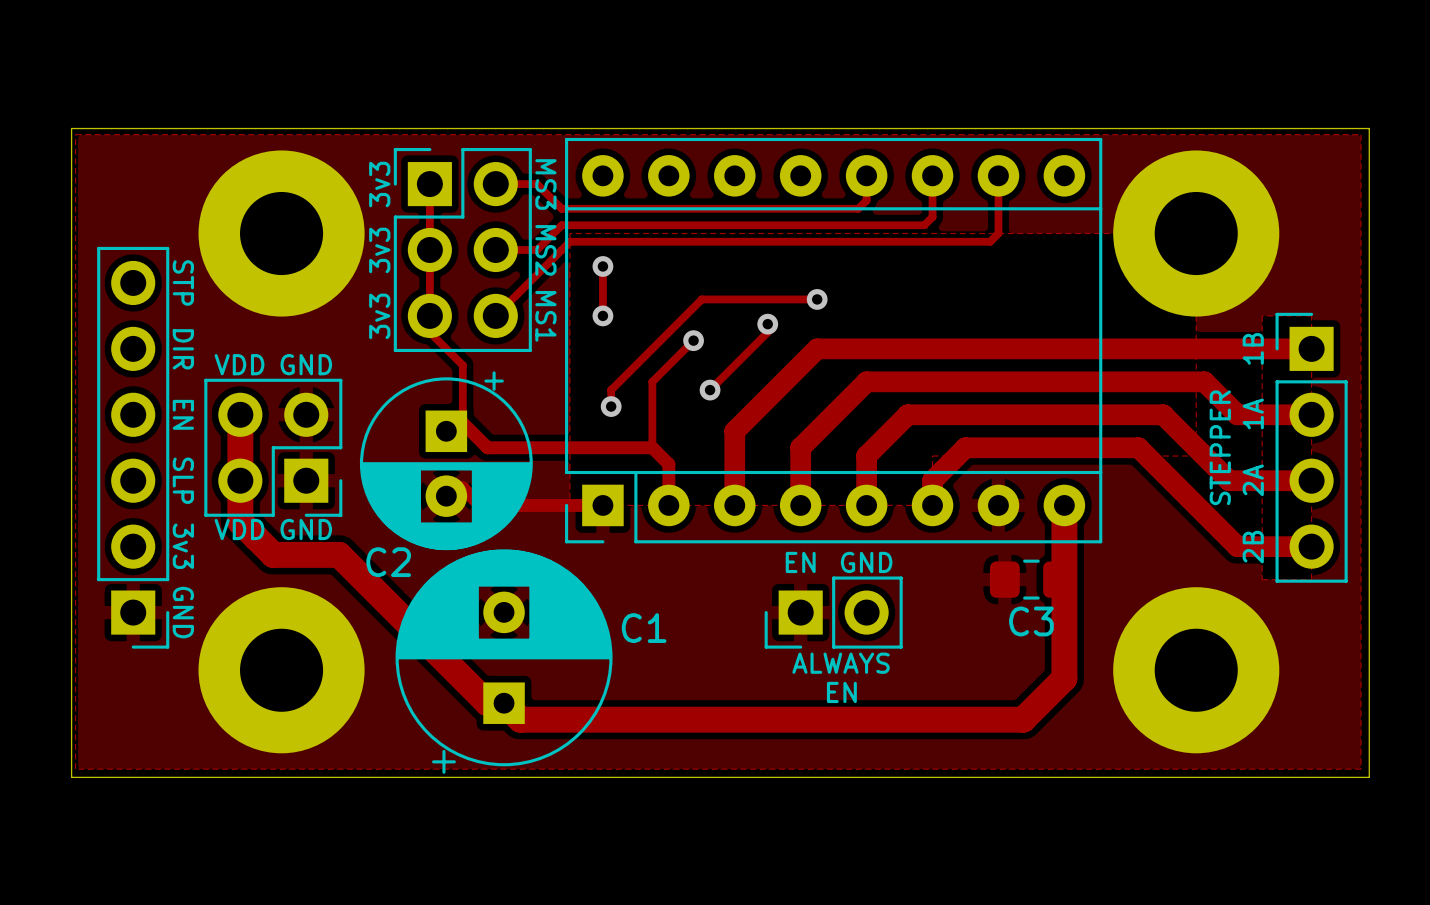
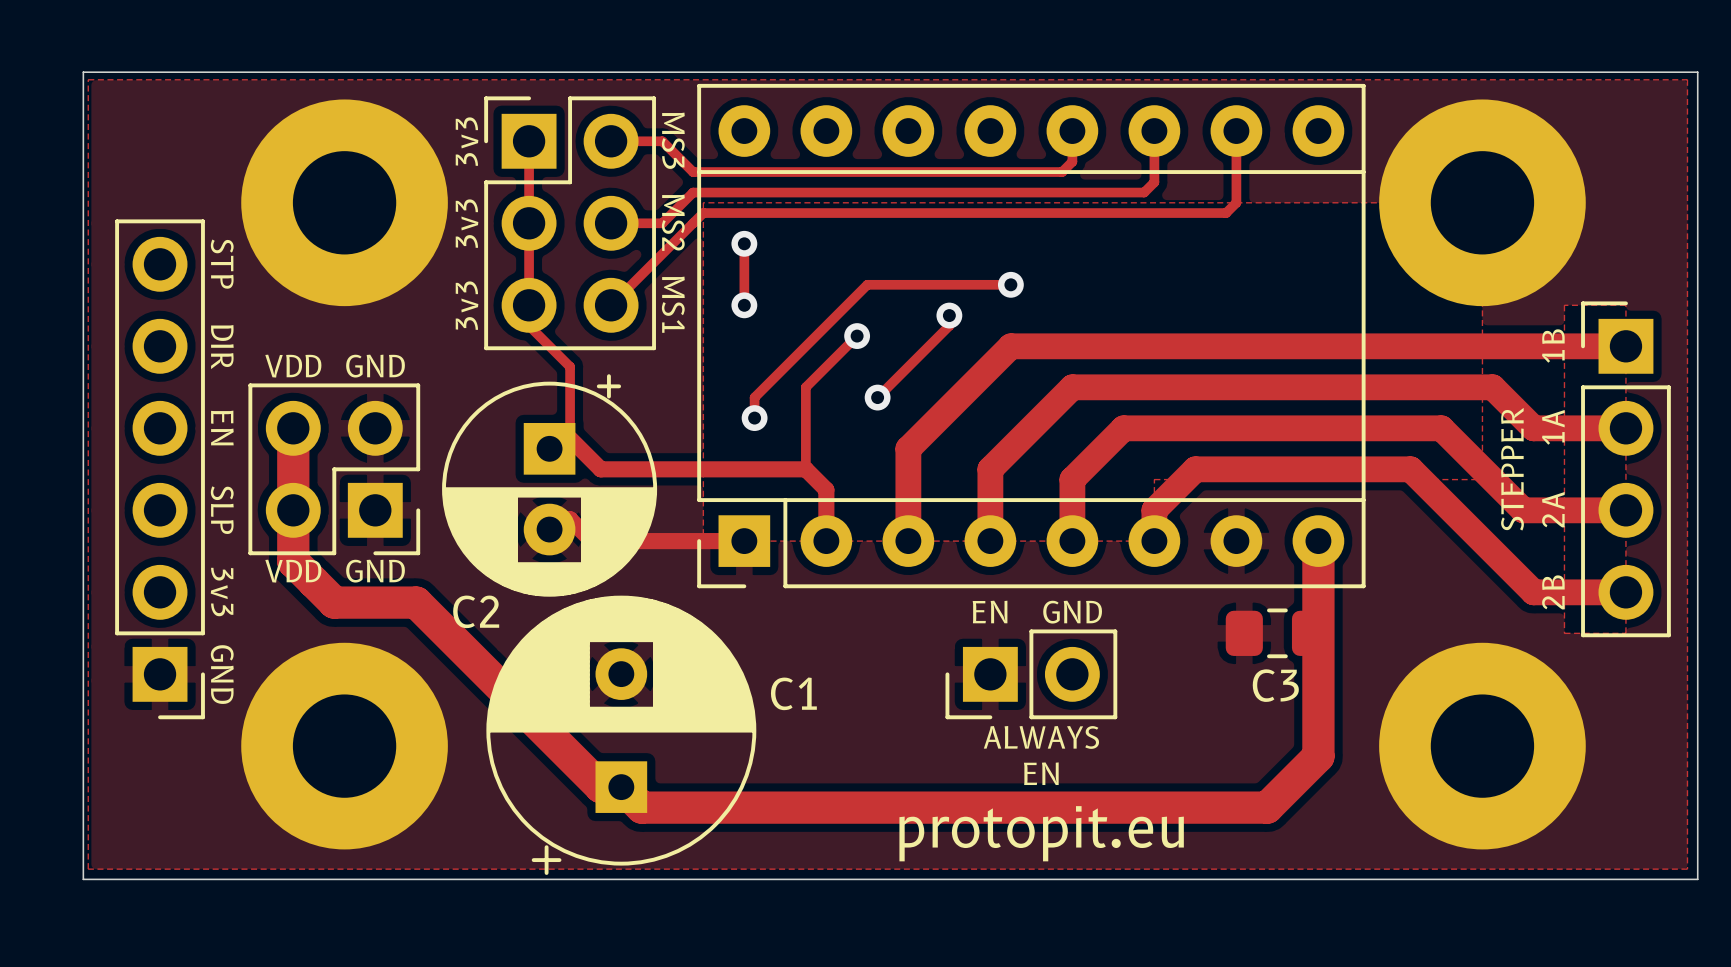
text: none -> protopit.eu (1041, 833)

